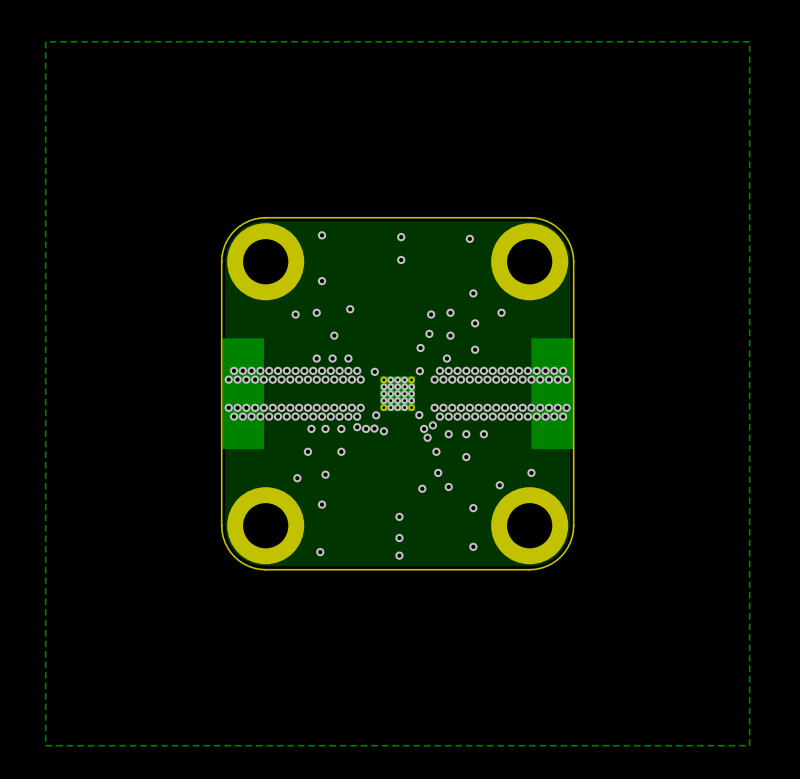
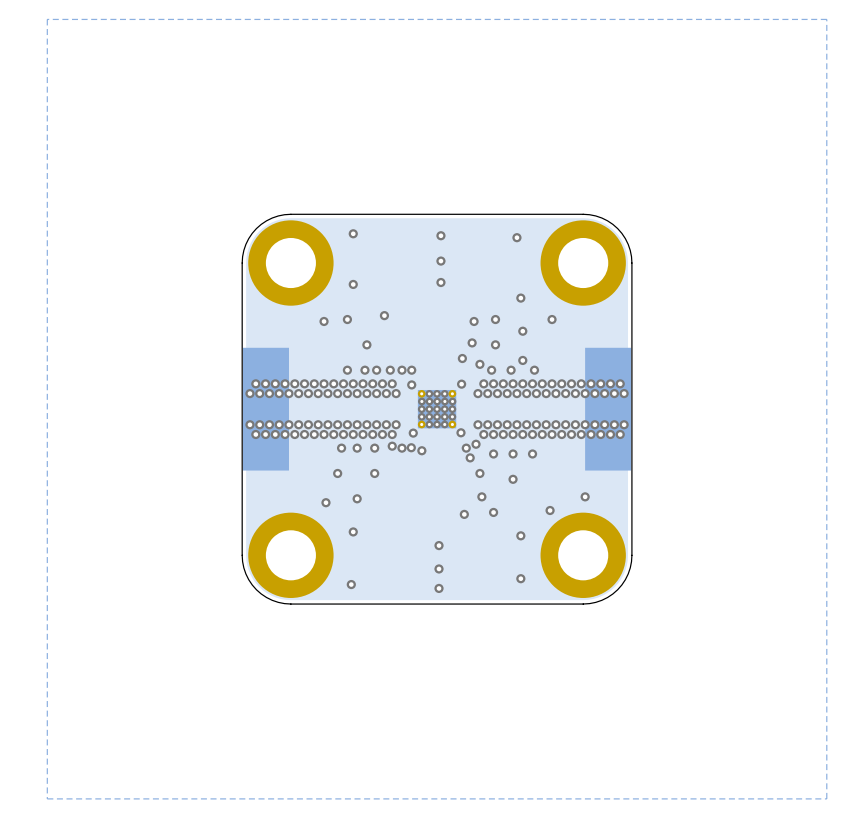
via: none -> (440, 282)
via: none -> (479, 364)
via: none -> (376, 370)
via: (348, 358) -> none
via: none -> (390, 370)
via: none -> (401, 370)
via: none -> (411, 370)
via: none -> (511, 370)
via: none -> (534, 370)

